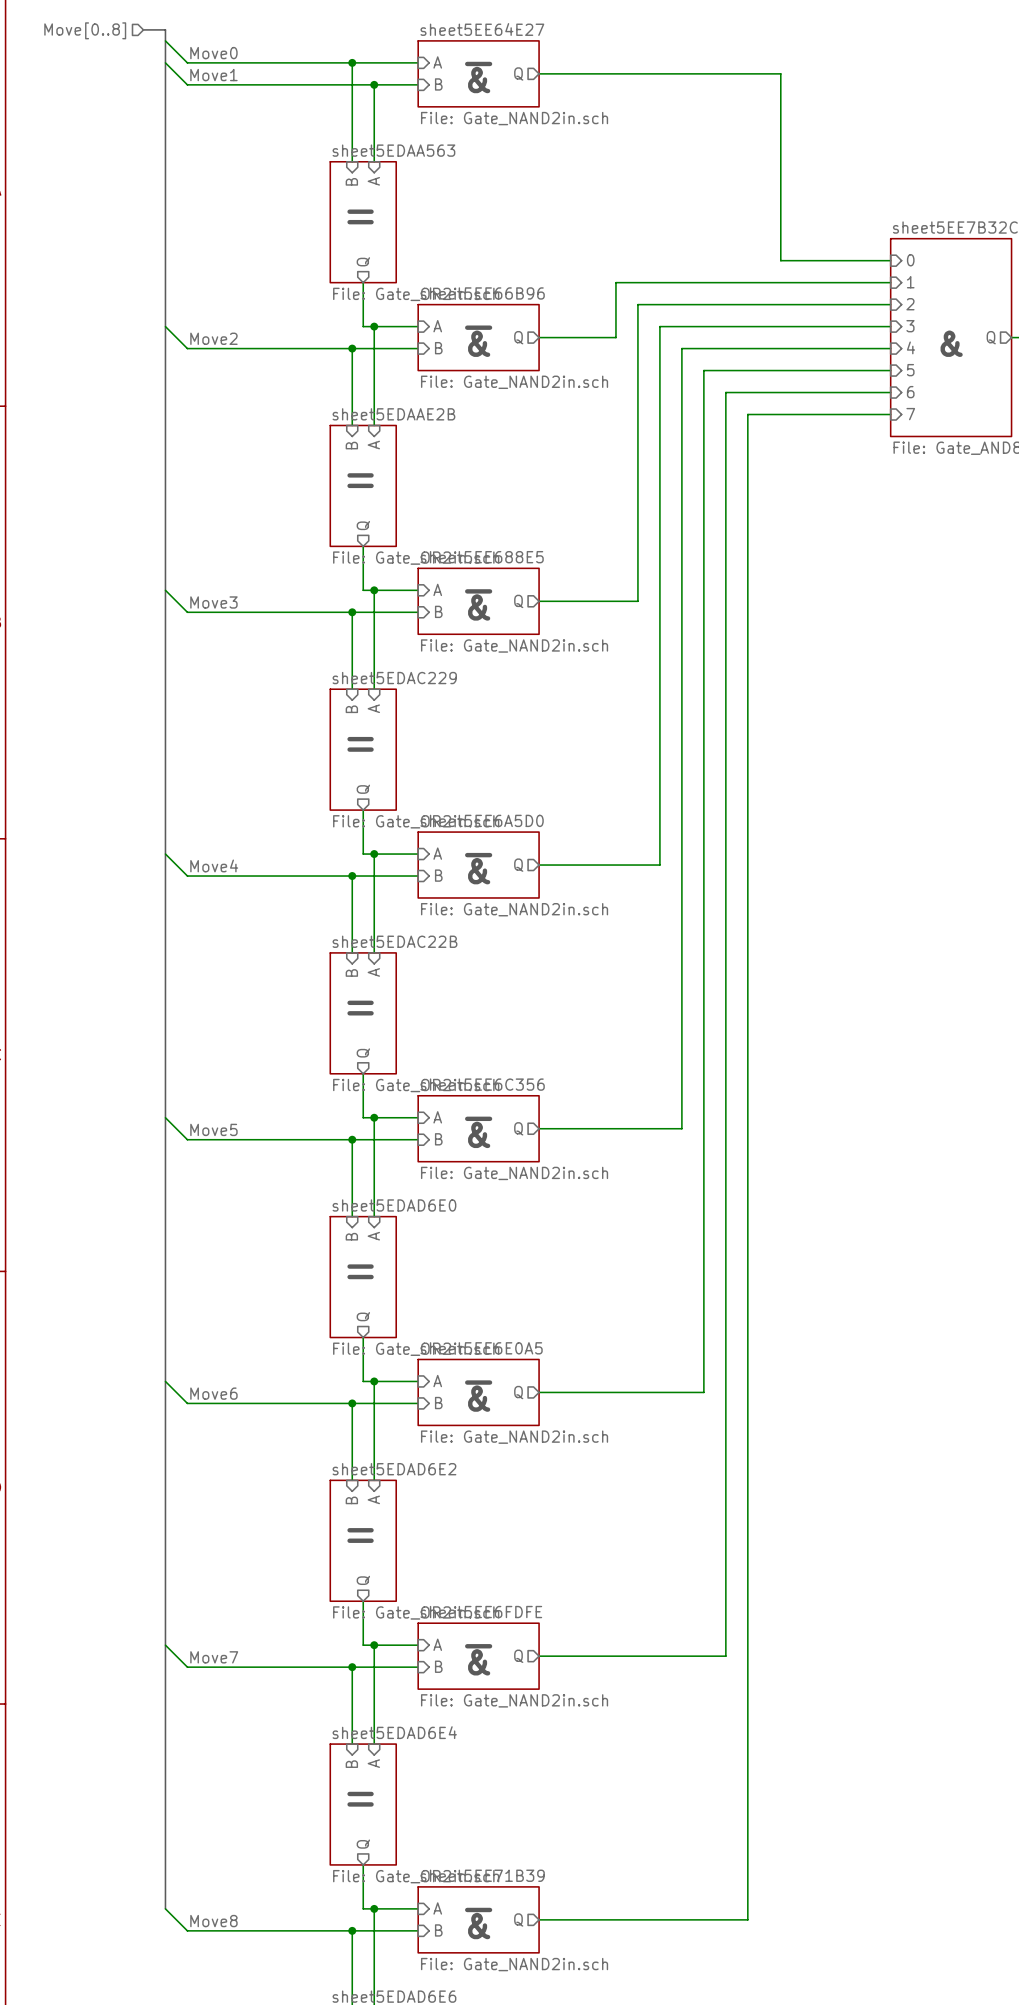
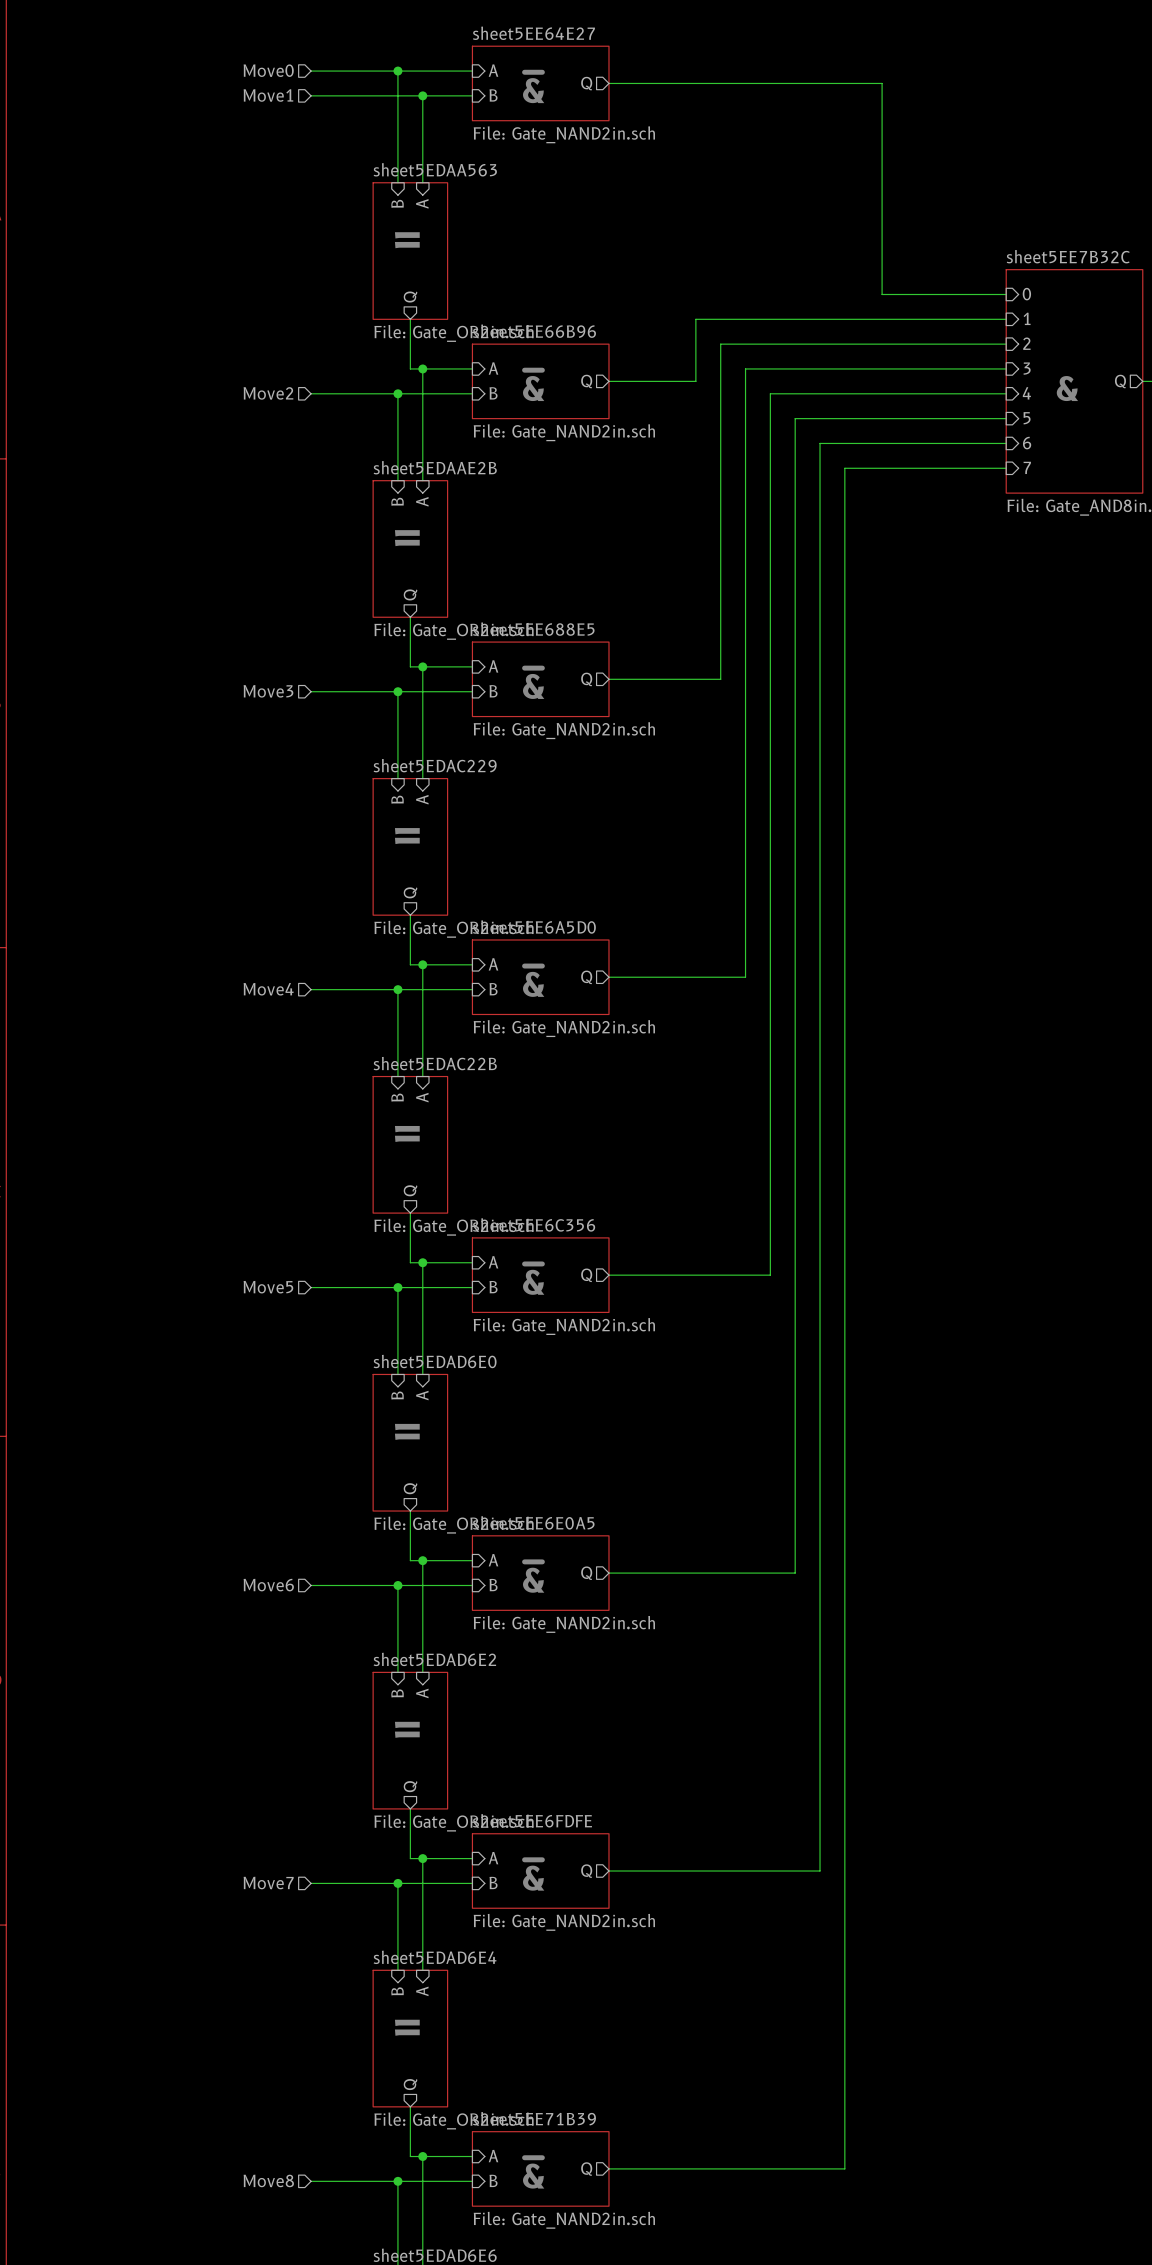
bus: (143, 29) (165, 29) (165, 1908) -> none
hierarchical label: Move[0..8] (85, 30) -> none
wire: (165, 40) (187, 62) (275, 62) -> none
label: Move0 (213, 53) -> none
wire: (165, 62) (187, 84) (275, 84) -> none
hierarchical label: none -> Move0 (268, 70)
label: Move1 (213, 75) -> none
hierarchical label: none -> Move1 (268, 95)
wire: (165, 326) (187, 348) (275, 348) -> none
label: Move2 (213, 338) -> none
hierarchical label: none -> Move2 (268, 393)
wire: (165, 590) (187, 612) (275, 612) -> none
label: Move3 (213, 602) -> none
hierarchical label: none -> Move3 (268, 691)
wire: (165, 854) (187, 876) (275, 876) -> none
label: Move4 (214, 865) -> none
hierarchical label: none -> Move4 (268, 989)
wire: (165, 1117) (187, 1139) (275, 1139) -> none
label: Move5 (213, 1129) -> none
hierarchical label: none -> Move5 (268, 1287)
wire: (165, 1381) (187, 1403) (275, 1403) -> none
label: Move6 (213, 1393) -> none
hierarchical label: none -> Move6 (268, 1585)
wire: (165, 1645) (187, 1667) (275, 1667) -> none
label: Move7 (214, 1657) -> none
hierarchical label: none -> Move7 (268, 1883)
wire: (165, 1908) (187, 1930) (275, 1930) -> none
label: Move8 (213, 1921) -> none
hierarchical label: none -> Move8 (268, 2180)

